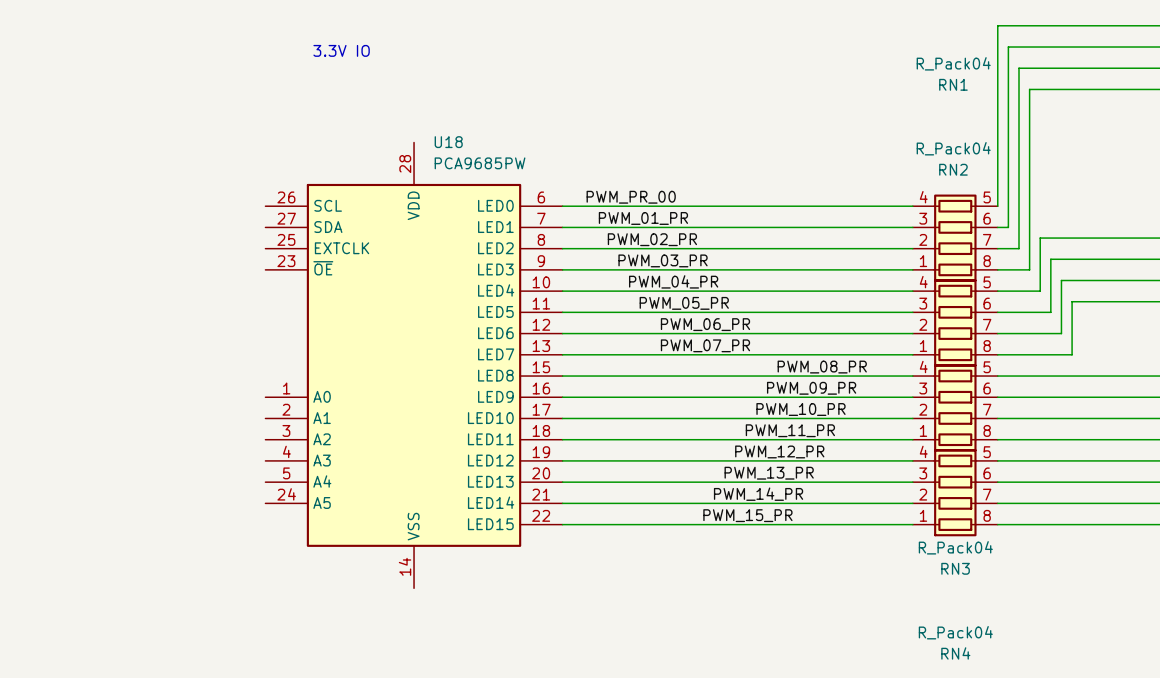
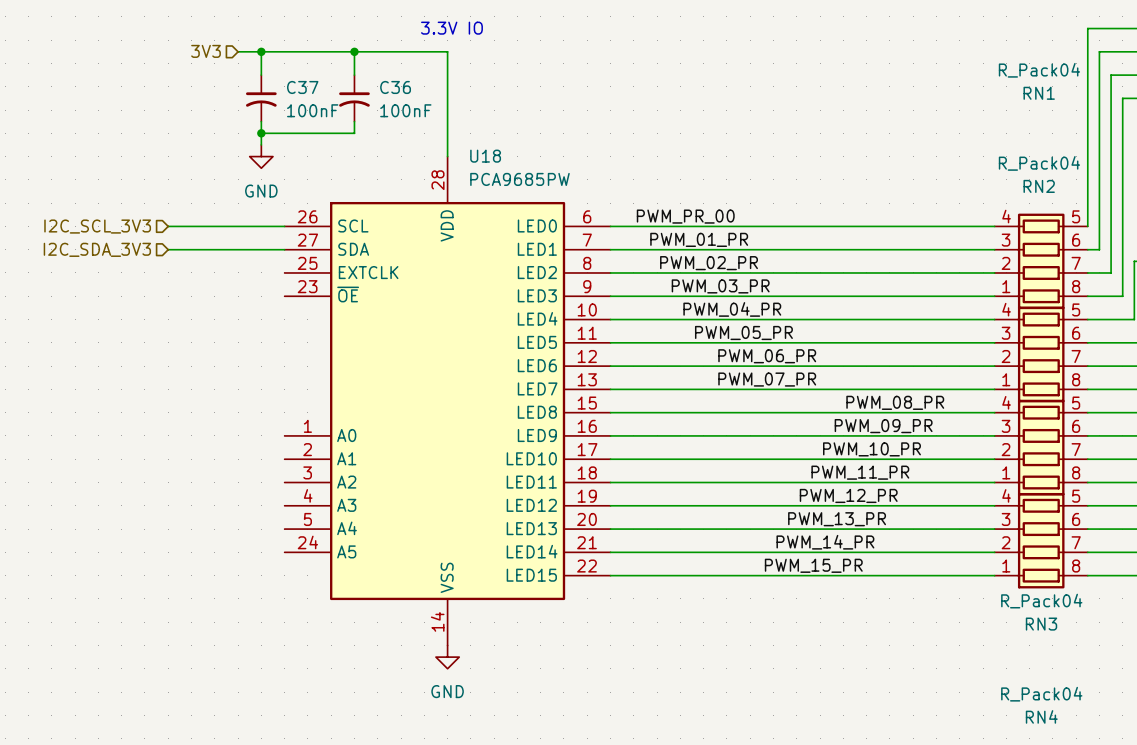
hierarchical label: none -> 3V3 (206, 51)
wire: none -> (238, 51) (447, 51) (447, 156)
wire: none -> (261, 51) (261, 75)
junction: none -> (261, 51)
wire: none -> (354, 51) (354, 75)
junction: none -> (354, 51)
text position: 3.3V IO (341, 50) -> 3.3V IO (451, 28)
C37: none -> 100nF (261, 98)
C36: none -> 100nF (354, 98)
wire: none -> (261, 121) (261, 144)
wire: none -> (354, 121) (354, 133) (261, 133)
junction: none -> (261, 133)
power symbol: none -> GND (261, 156)
hierarchical label: none -> I2C_SCL_3V3 (97, 226)
wire: none -> (168, 226) (284, 226)
hierarchical label: none -> I2C_SDA_3V3 (97, 249)
wire: none -> (168, 249) (284, 249)
power symbol: none -> GND (447, 657)

